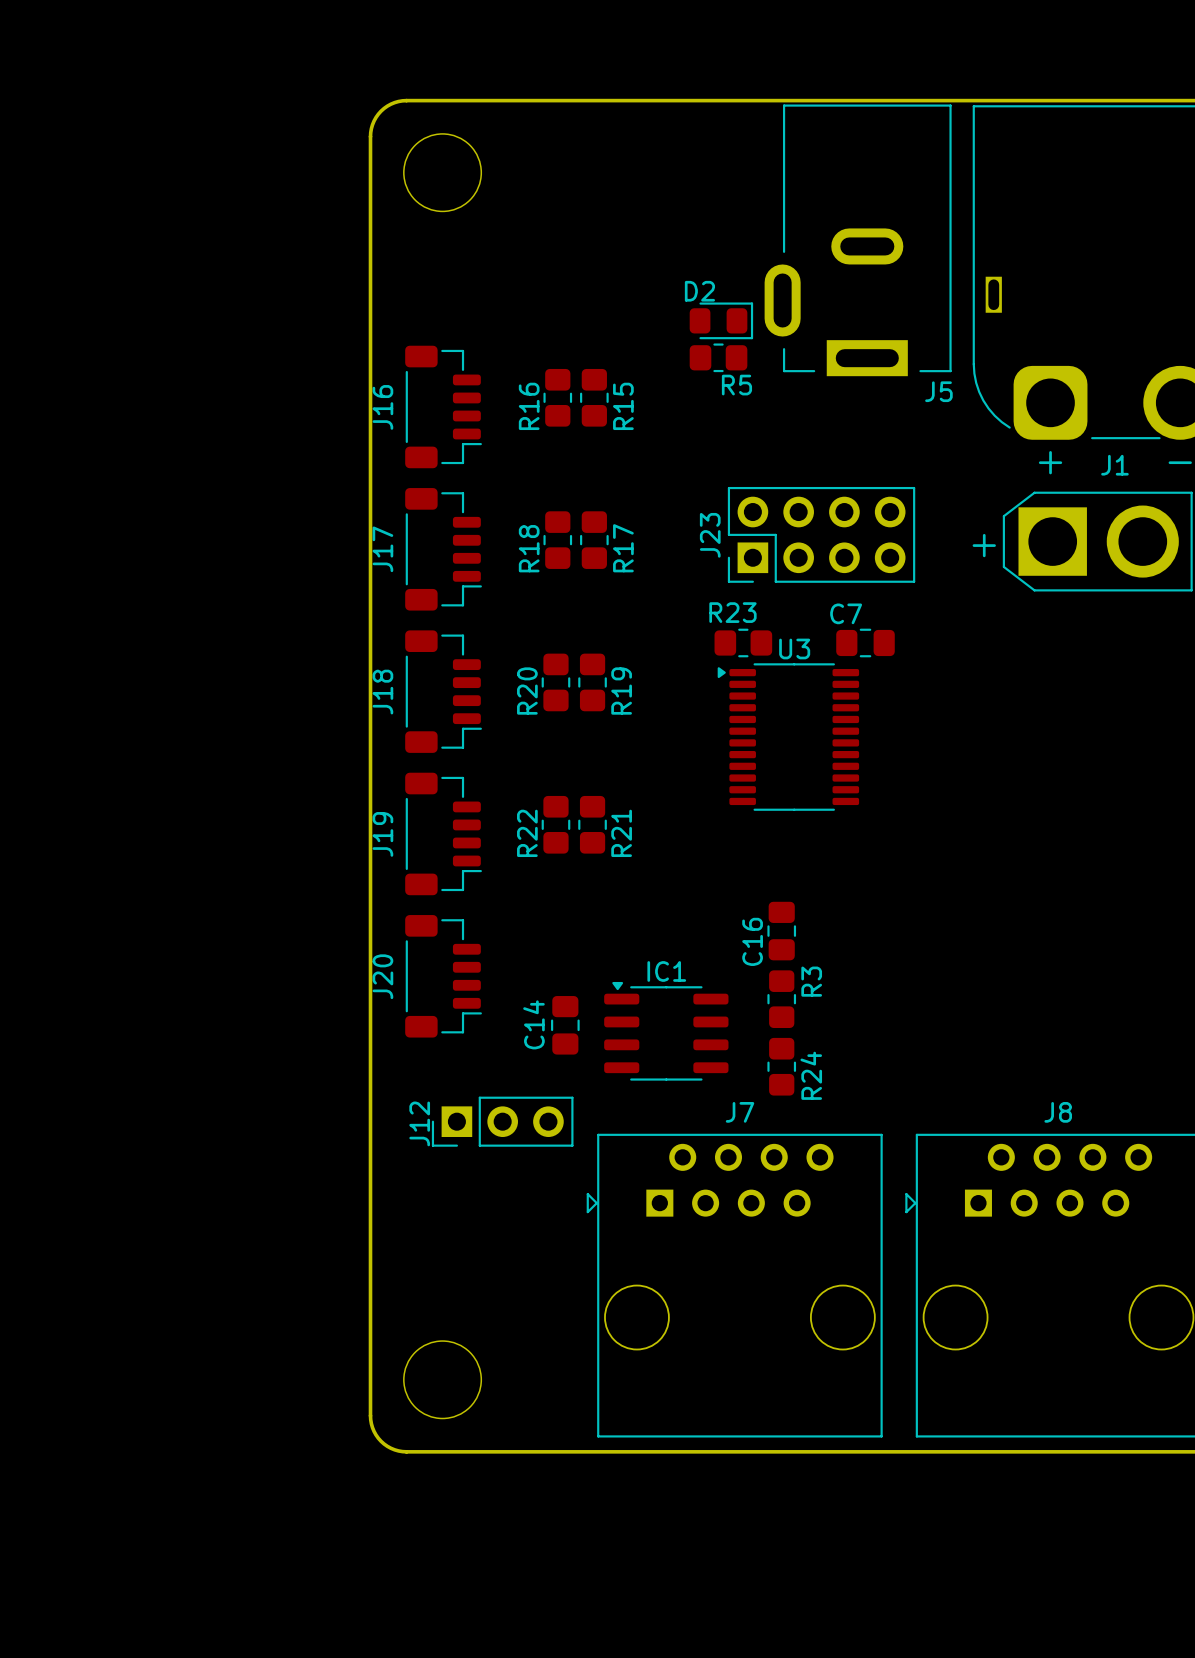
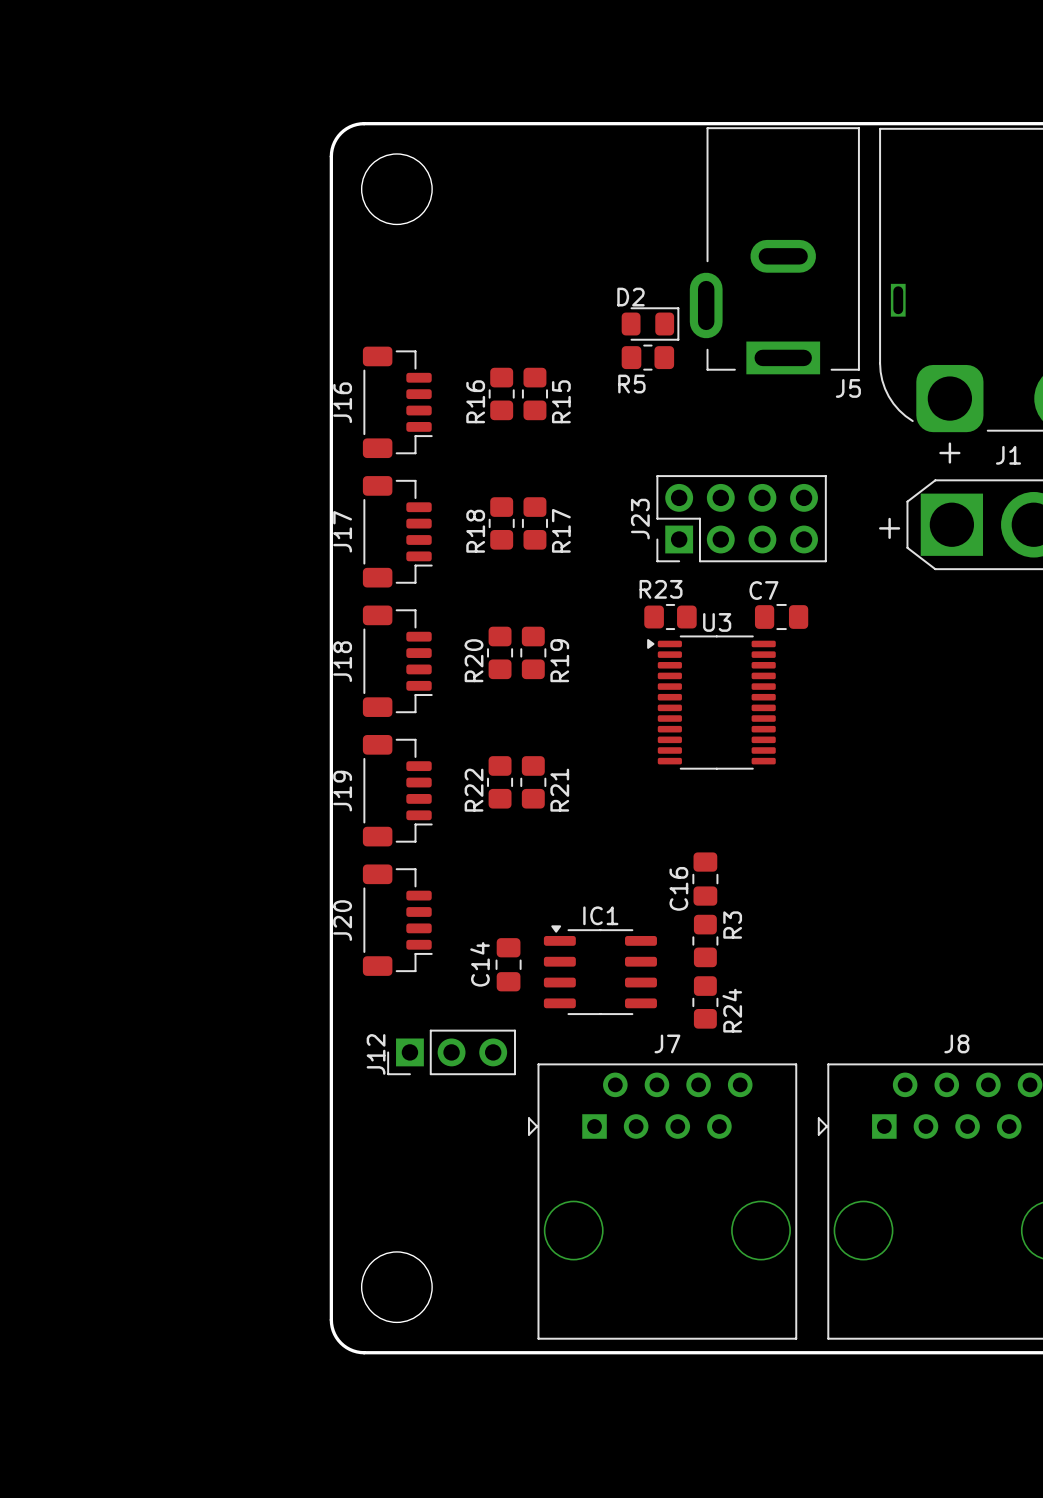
R5 name position: R5 (736, 385) -> R5 (631, 384)

